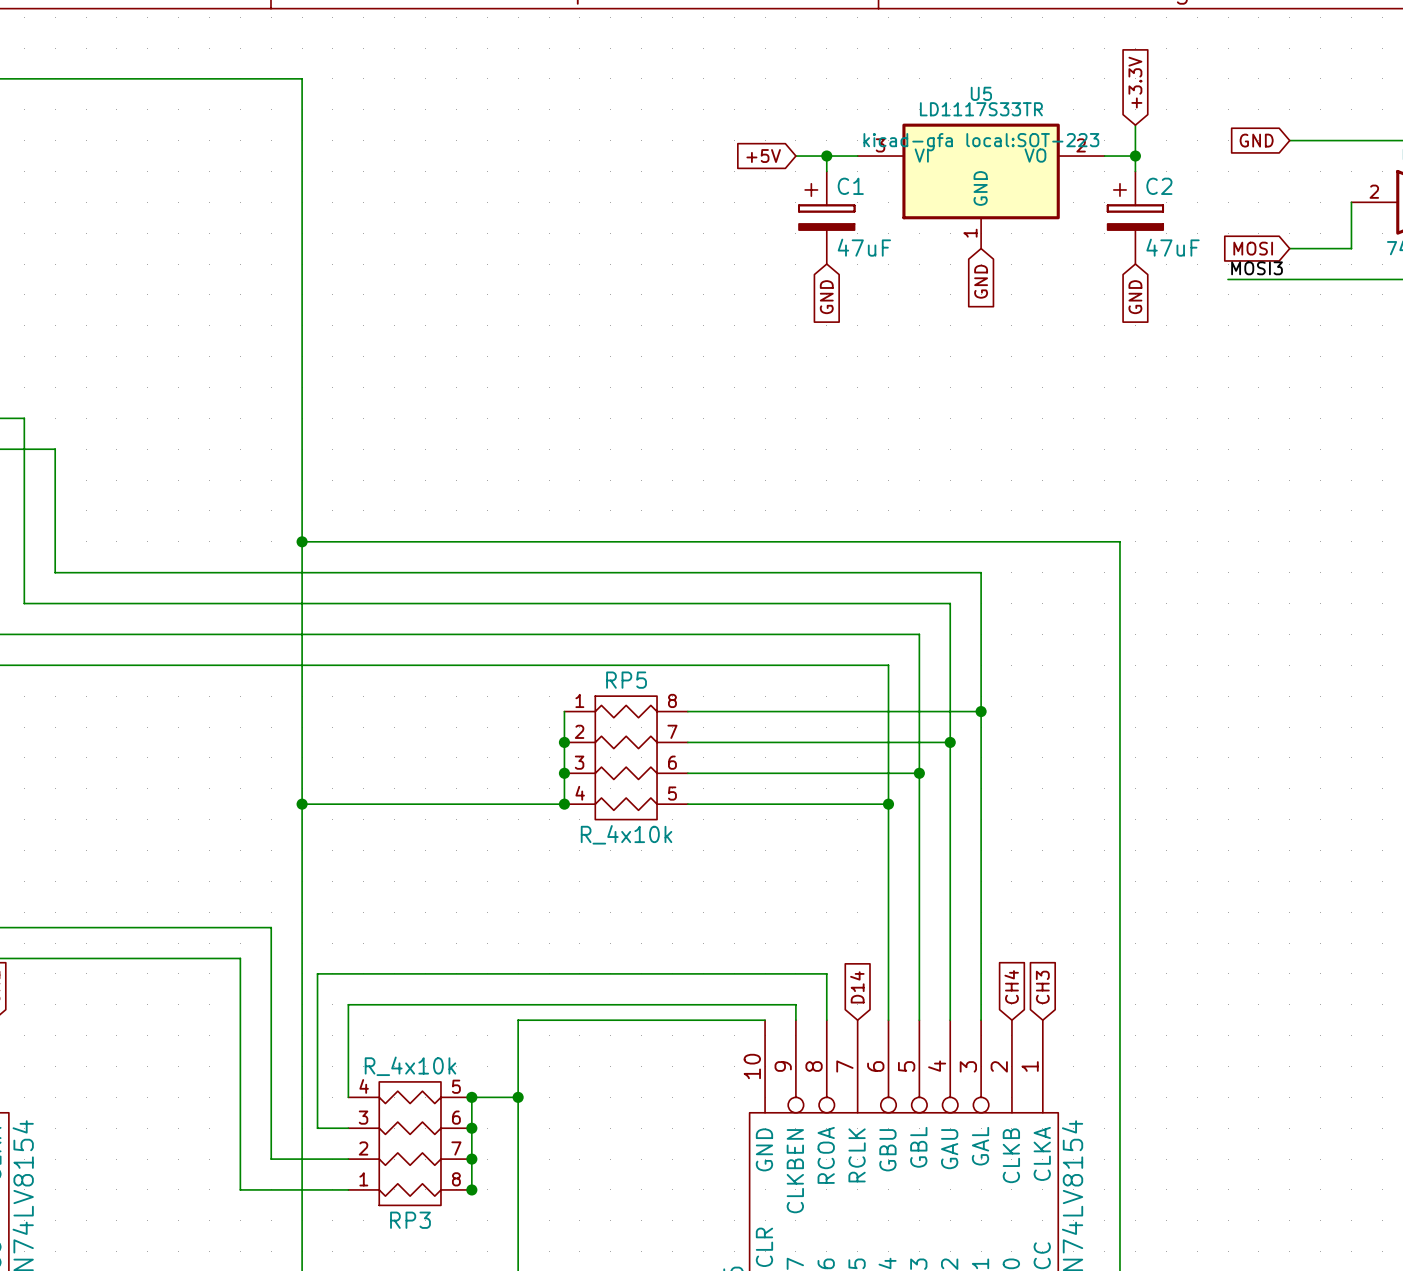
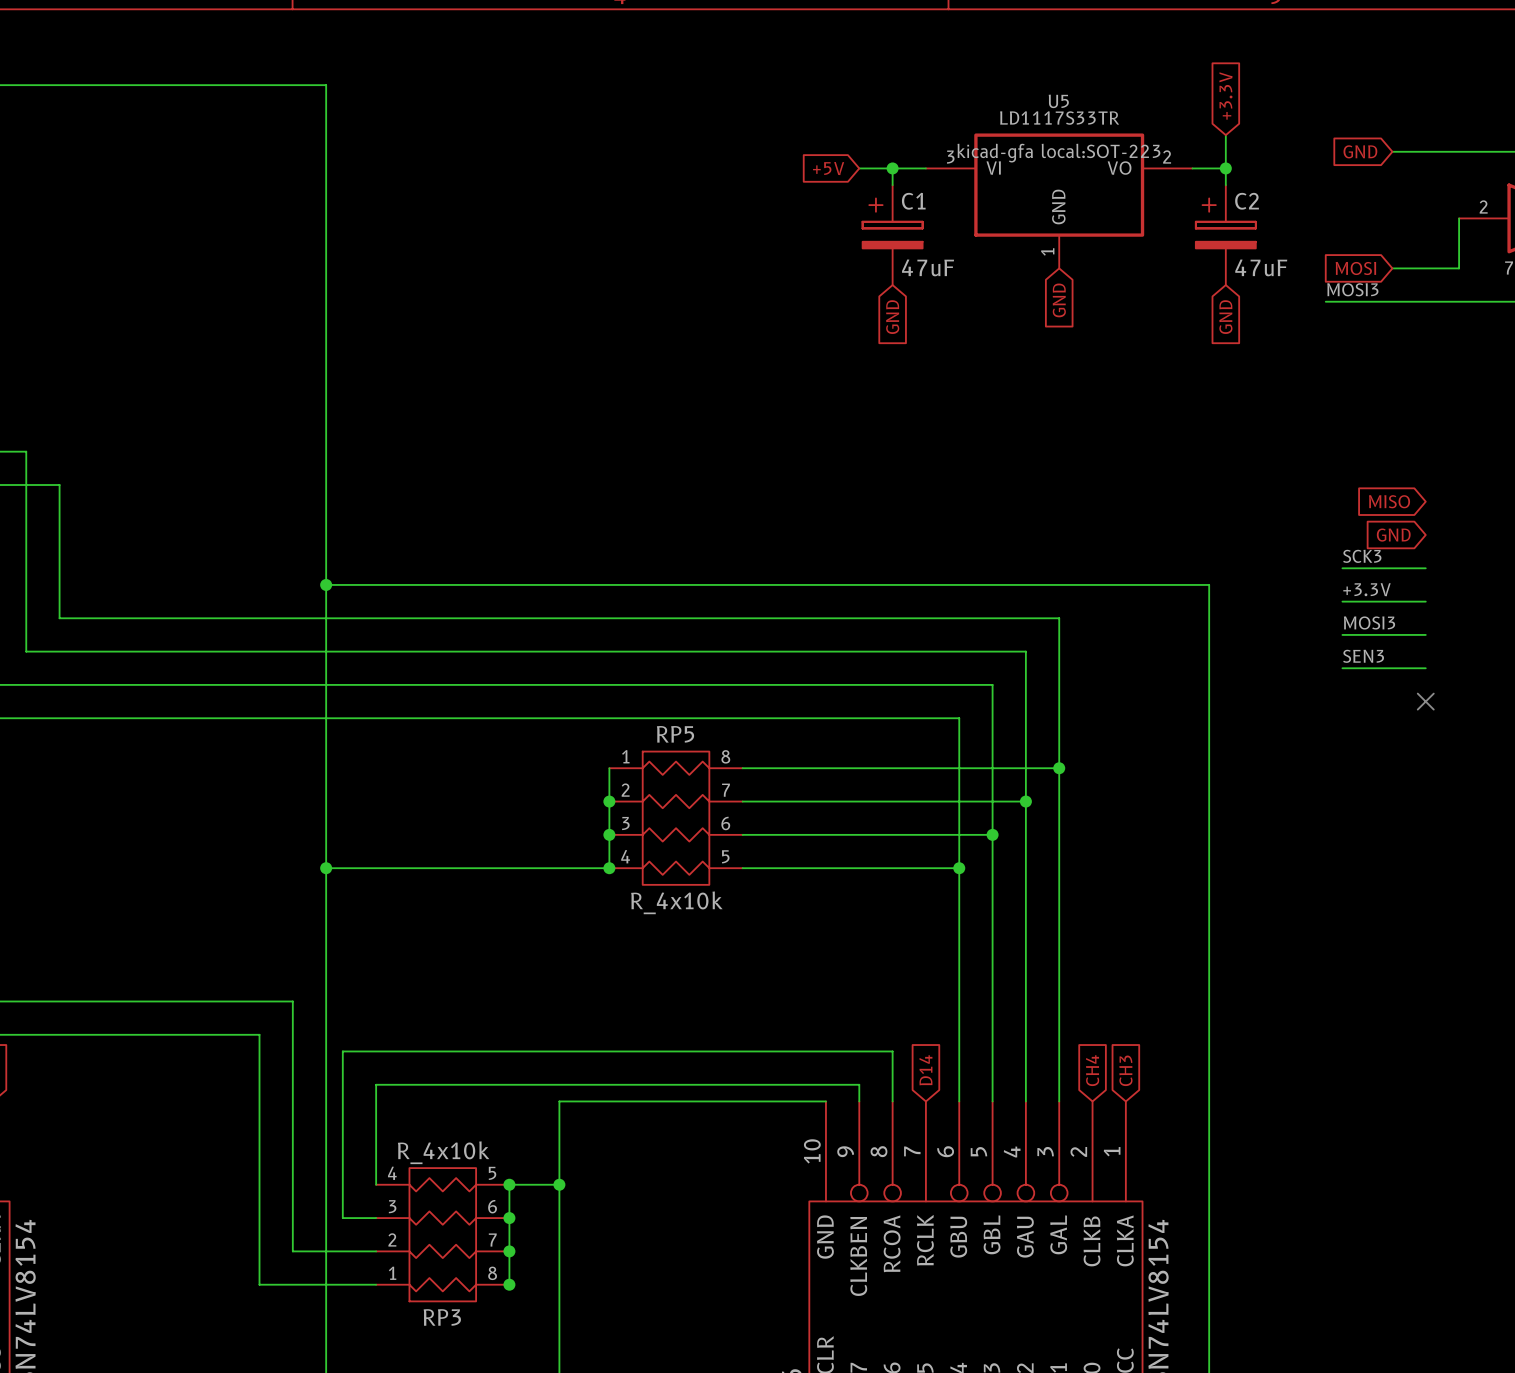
global label: none -> MISO (1389, 501)
global label: none -> GND (1393, 535)
label: none -> SCK3 (1362, 556)
wire: none -> (1342, 568) (1425, 568)
label: none -> +3.3V (1366, 589)
wire: none -> (1342, 601) (1425, 601)
label: none -> MOSI3 (1369, 622)
wire: none -> (1342, 634) (1425, 634)
label: none -> SEN3 (1363, 656)
wire: none -> (1342, 668) (1425, 668)
no-connect mark: none -> (1425, 701)

